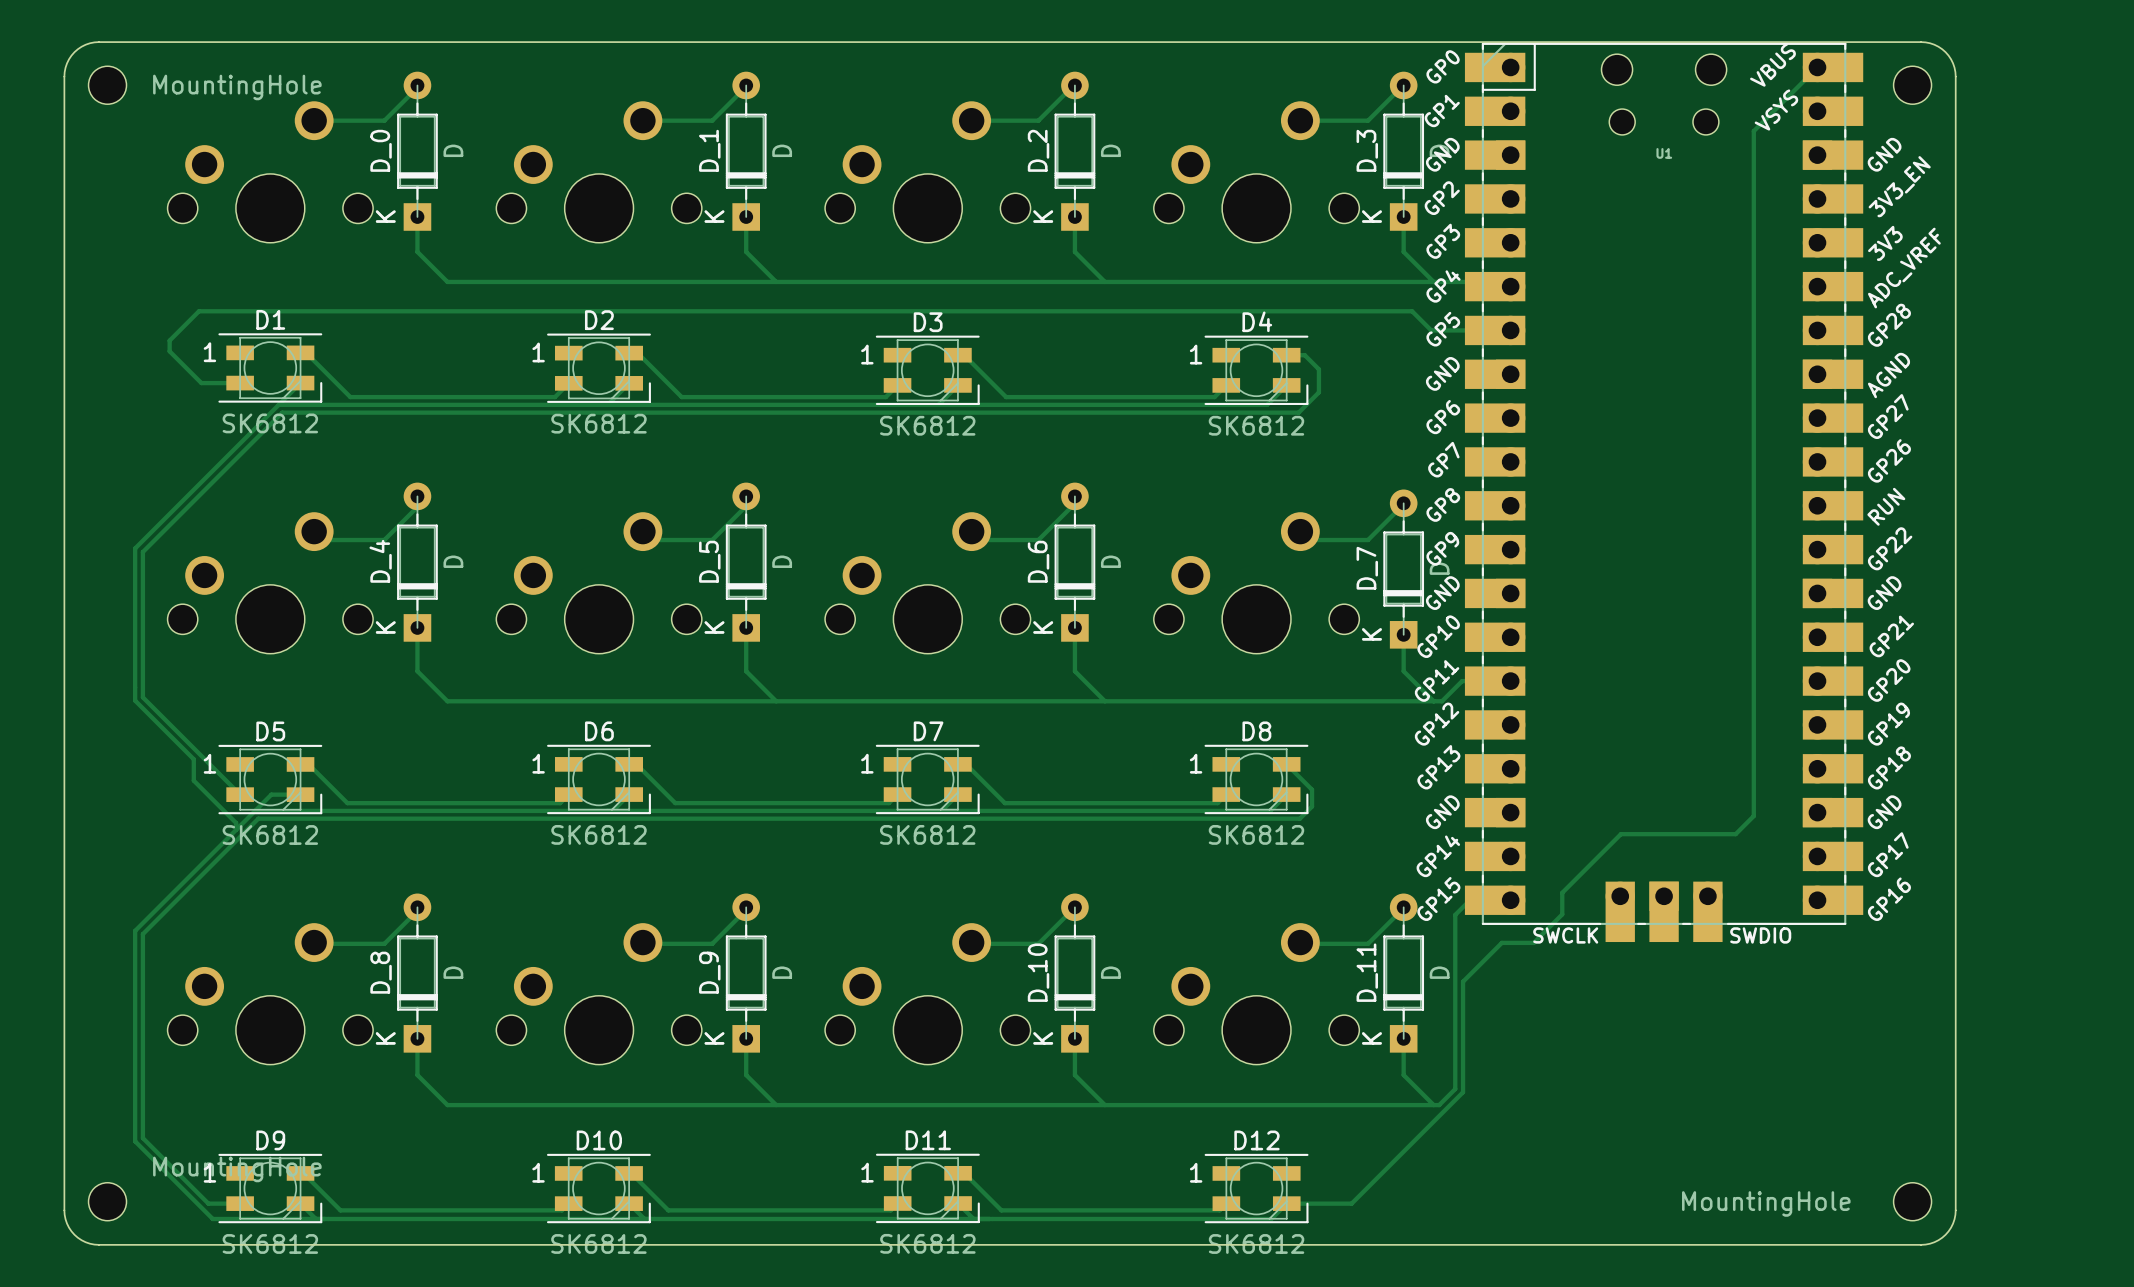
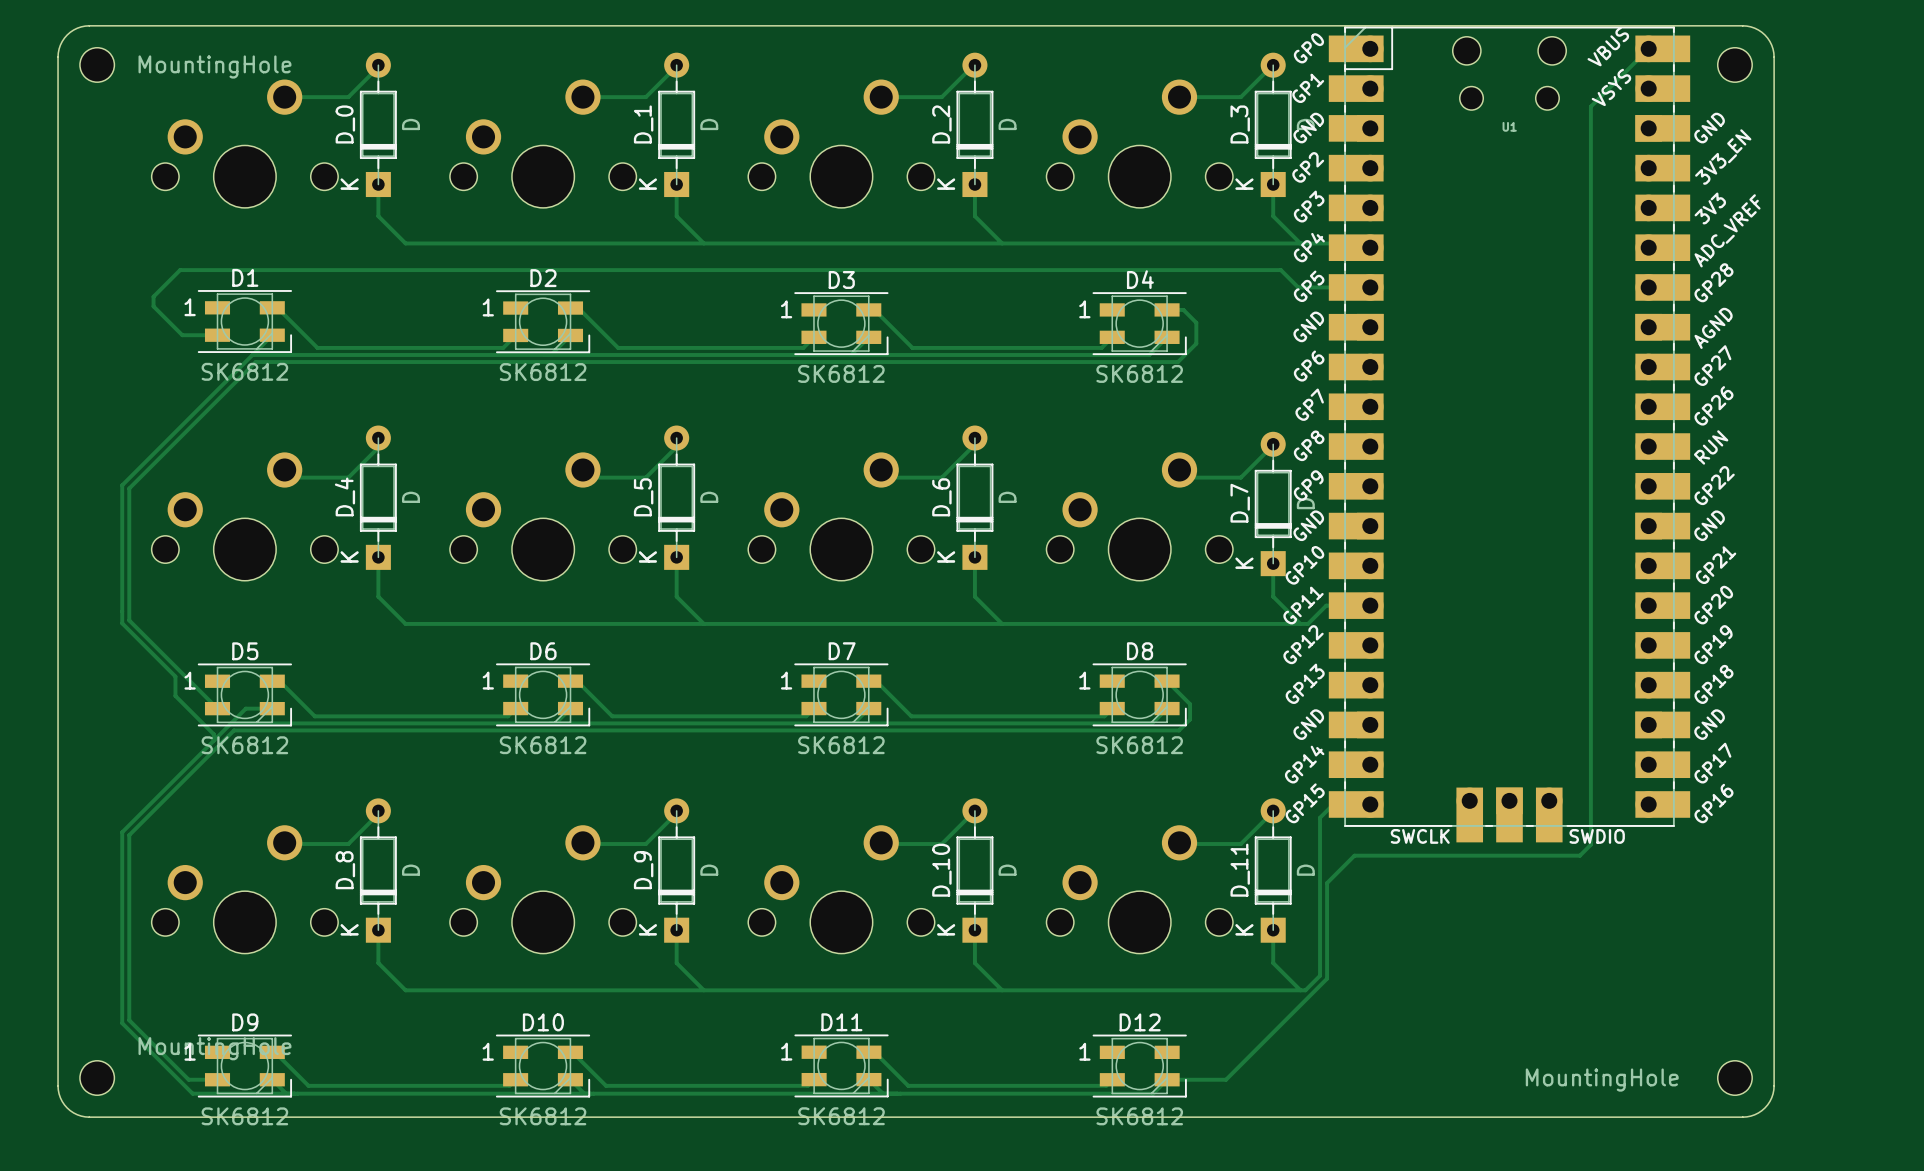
track: (1753, 816) (1735, 834) (1620, 834) (1562, 892) (1562, 914) (1533, 942) (1501, 942) (1463, 981) (1463, 986) -> (1590, 728) (1590, 844) (1579, 855) (1354, 855) (1327, 883)

